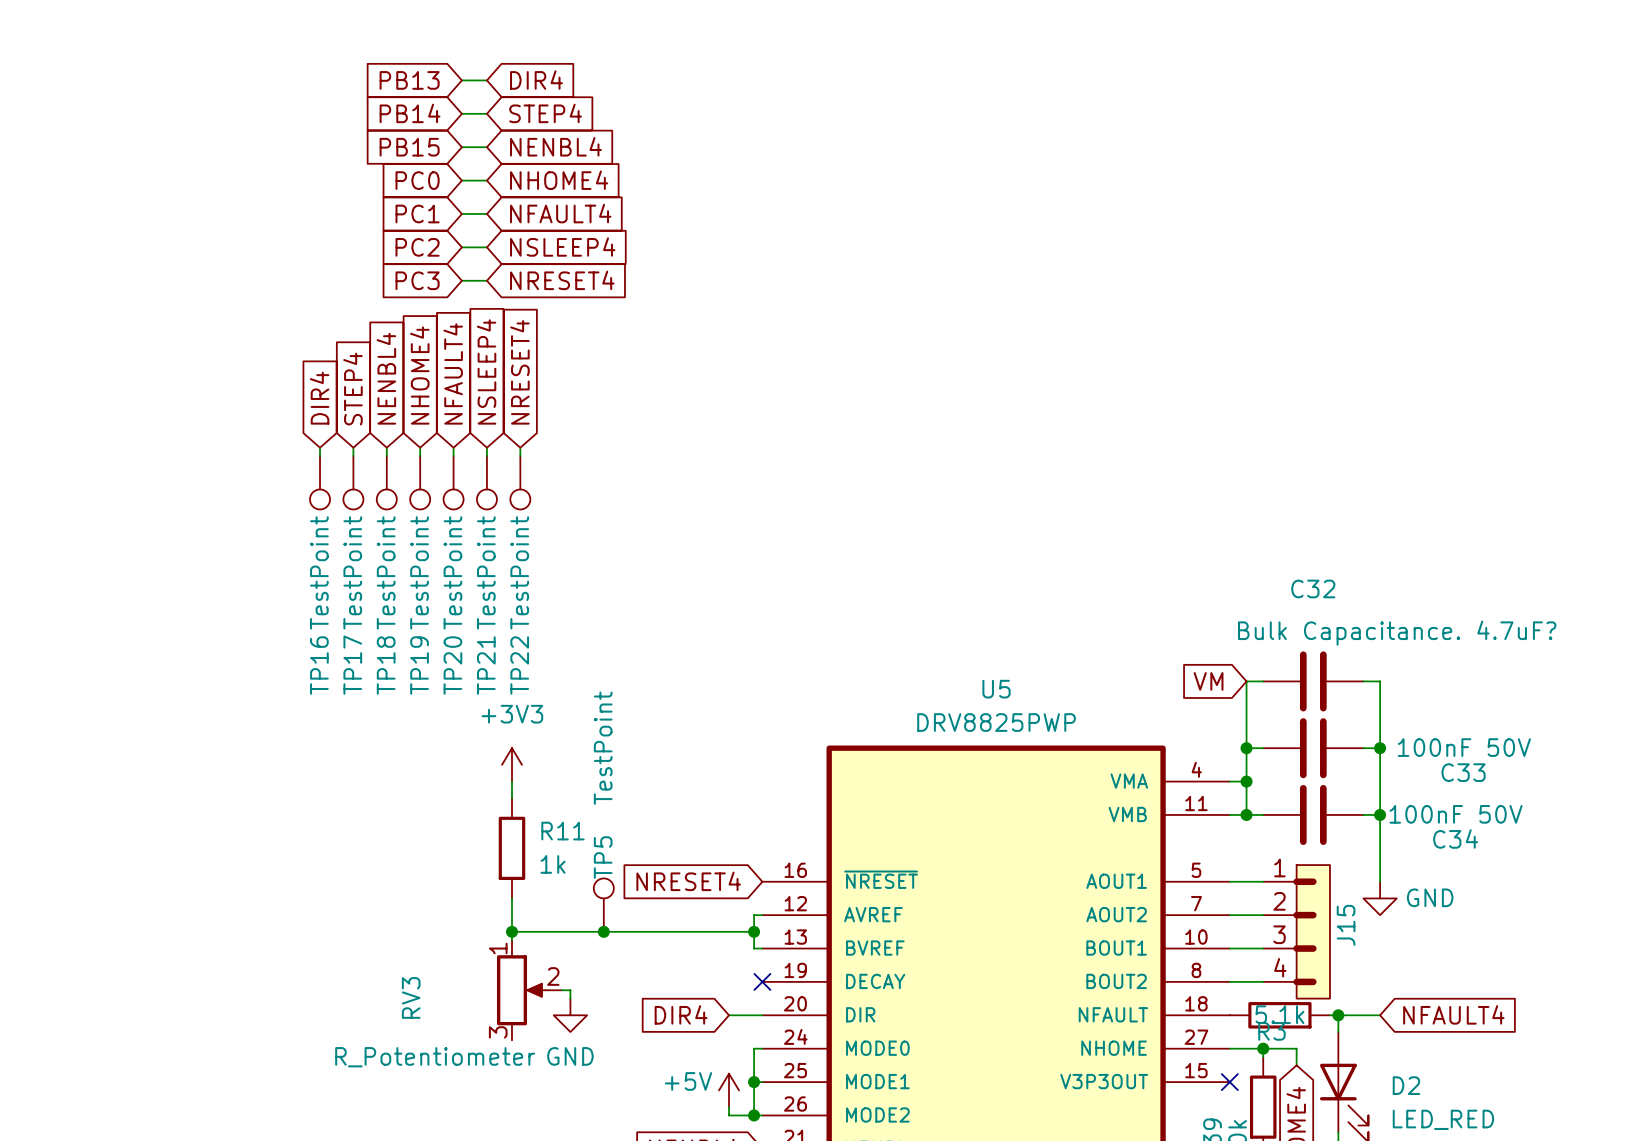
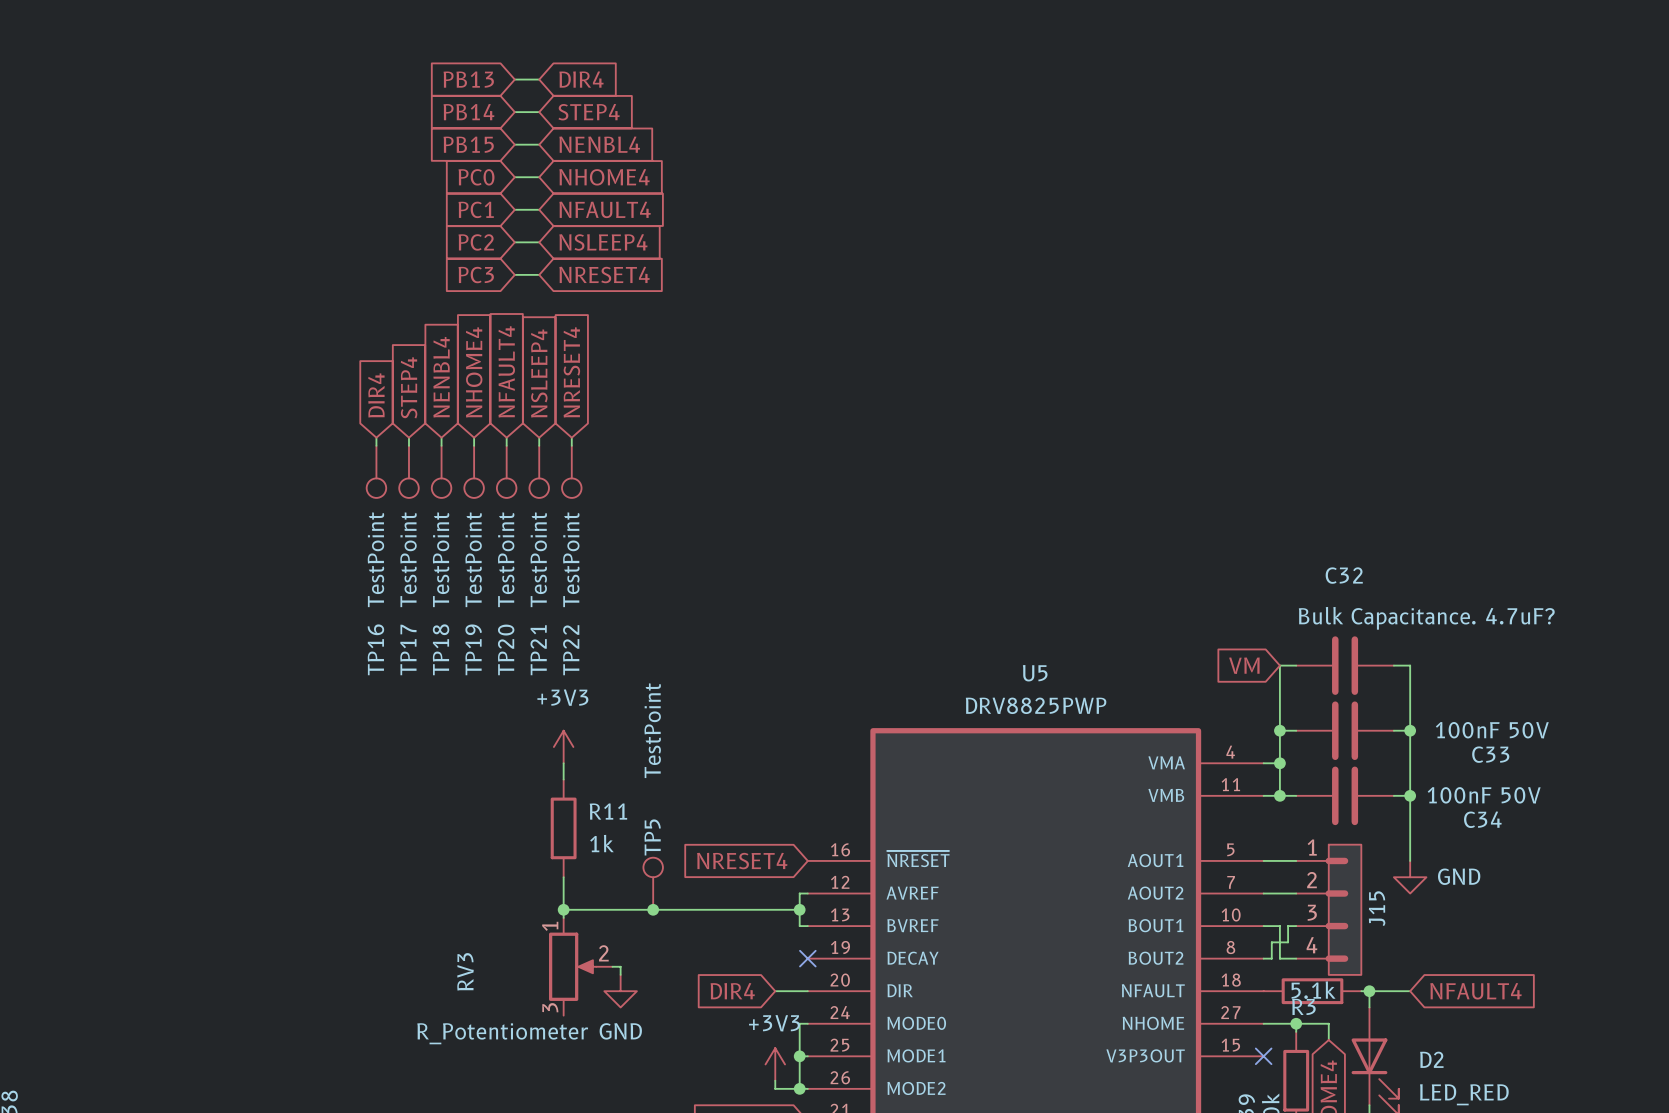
wire: (1246, 948) (1254, 948) -> (1271, 958) (1271, 942) (1288, 942) (1288, 926)
wire: (1238, 981) (1246, 981) -> (1279, 926) (1279, 958)
power symbol: +5V (729, 1090) -> +3V3 (775, 1064)

